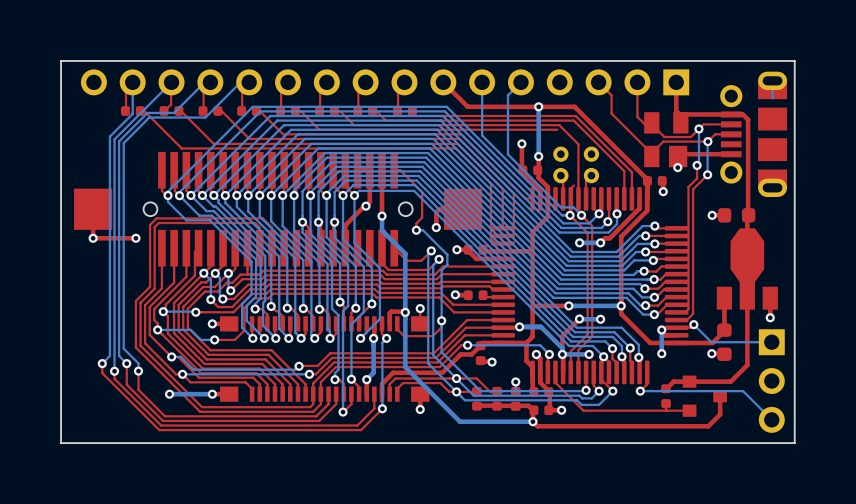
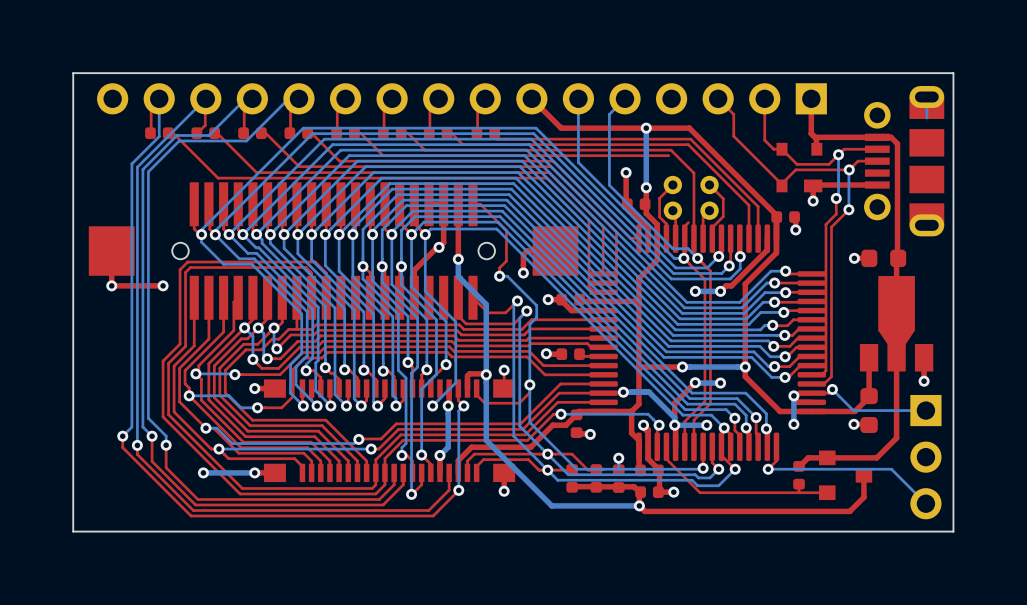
part footprint: [644, 112, 689, 168] -> [776, 142, 823, 193]
top track: none -> (672, 185) (659, 198) (659, 217) (666, 223) (666, 238)
top track: none -> (709, 185) (723, 198) (723, 216) (712, 227) (712, 238)
part footprint: [716, 228, 778, 310] -> [859, 275, 934, 372]

